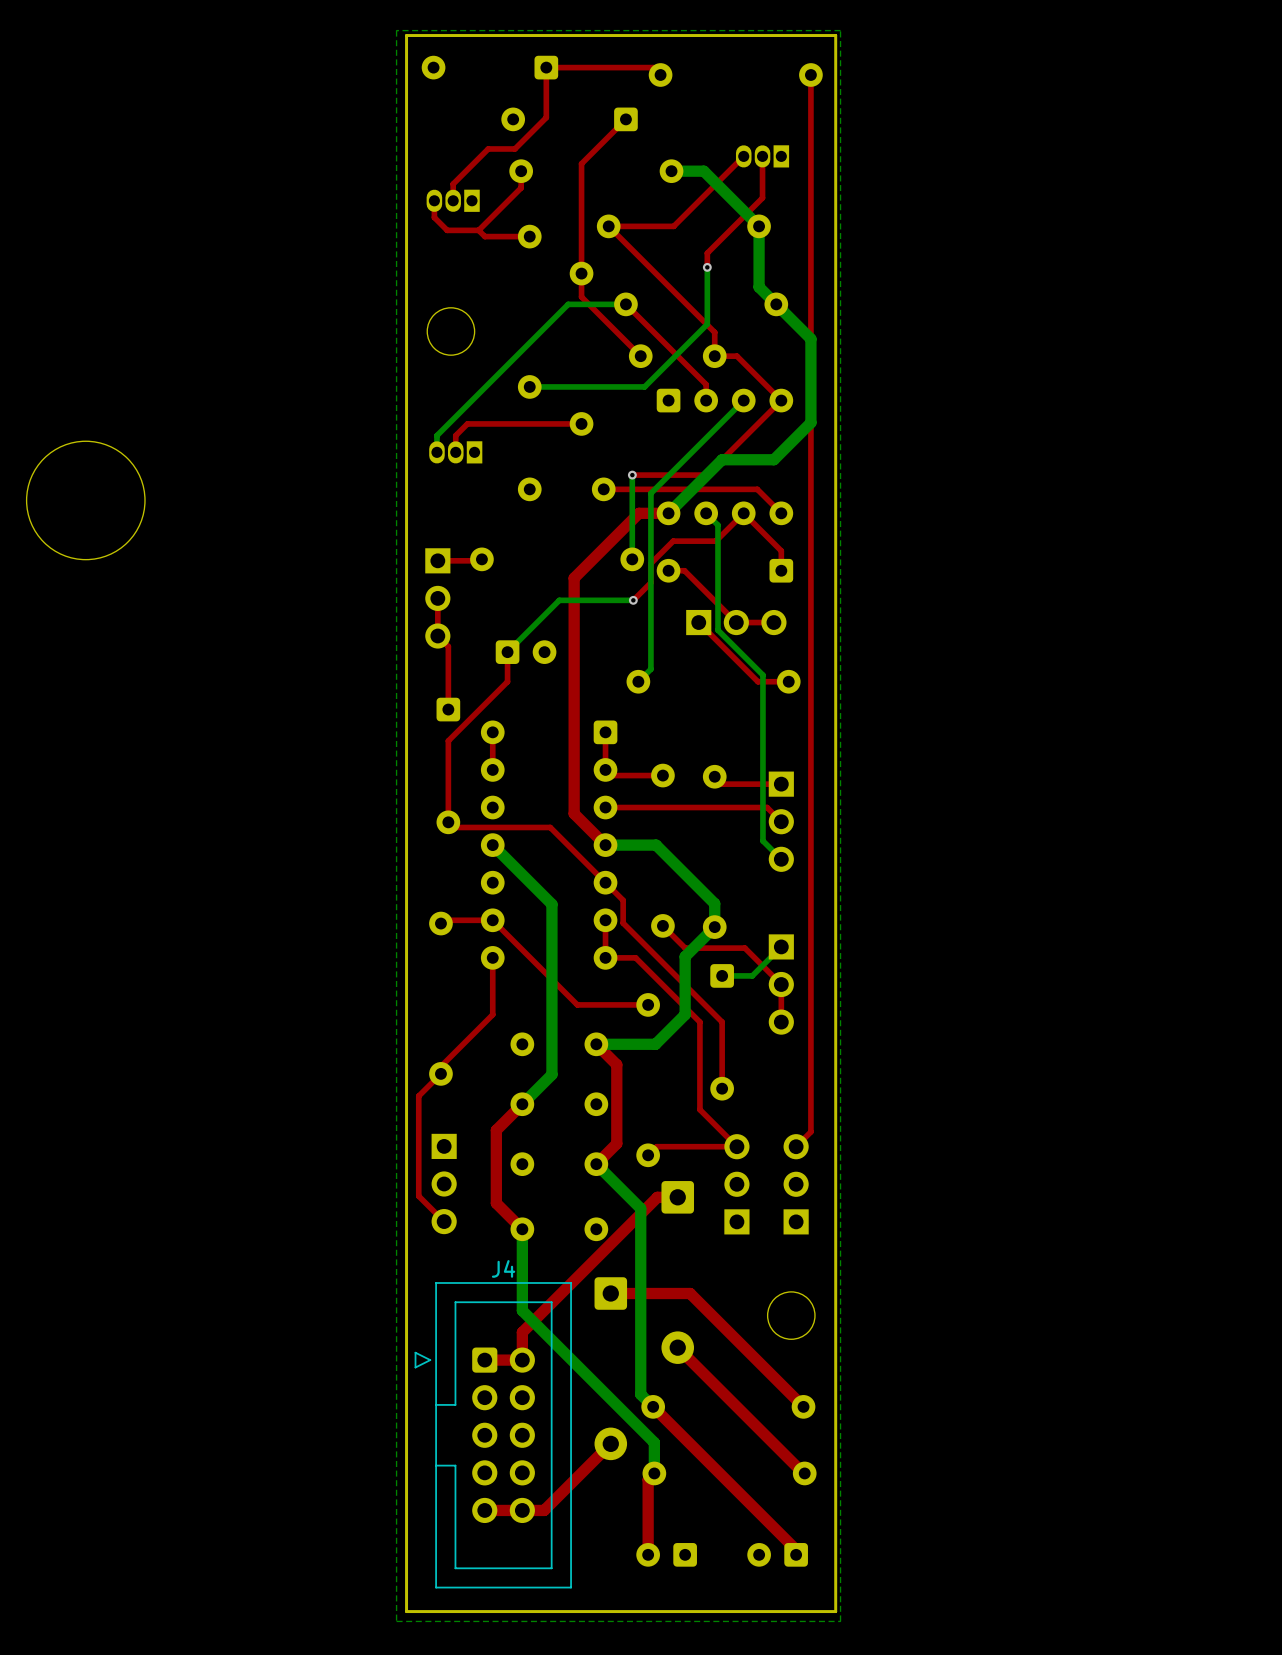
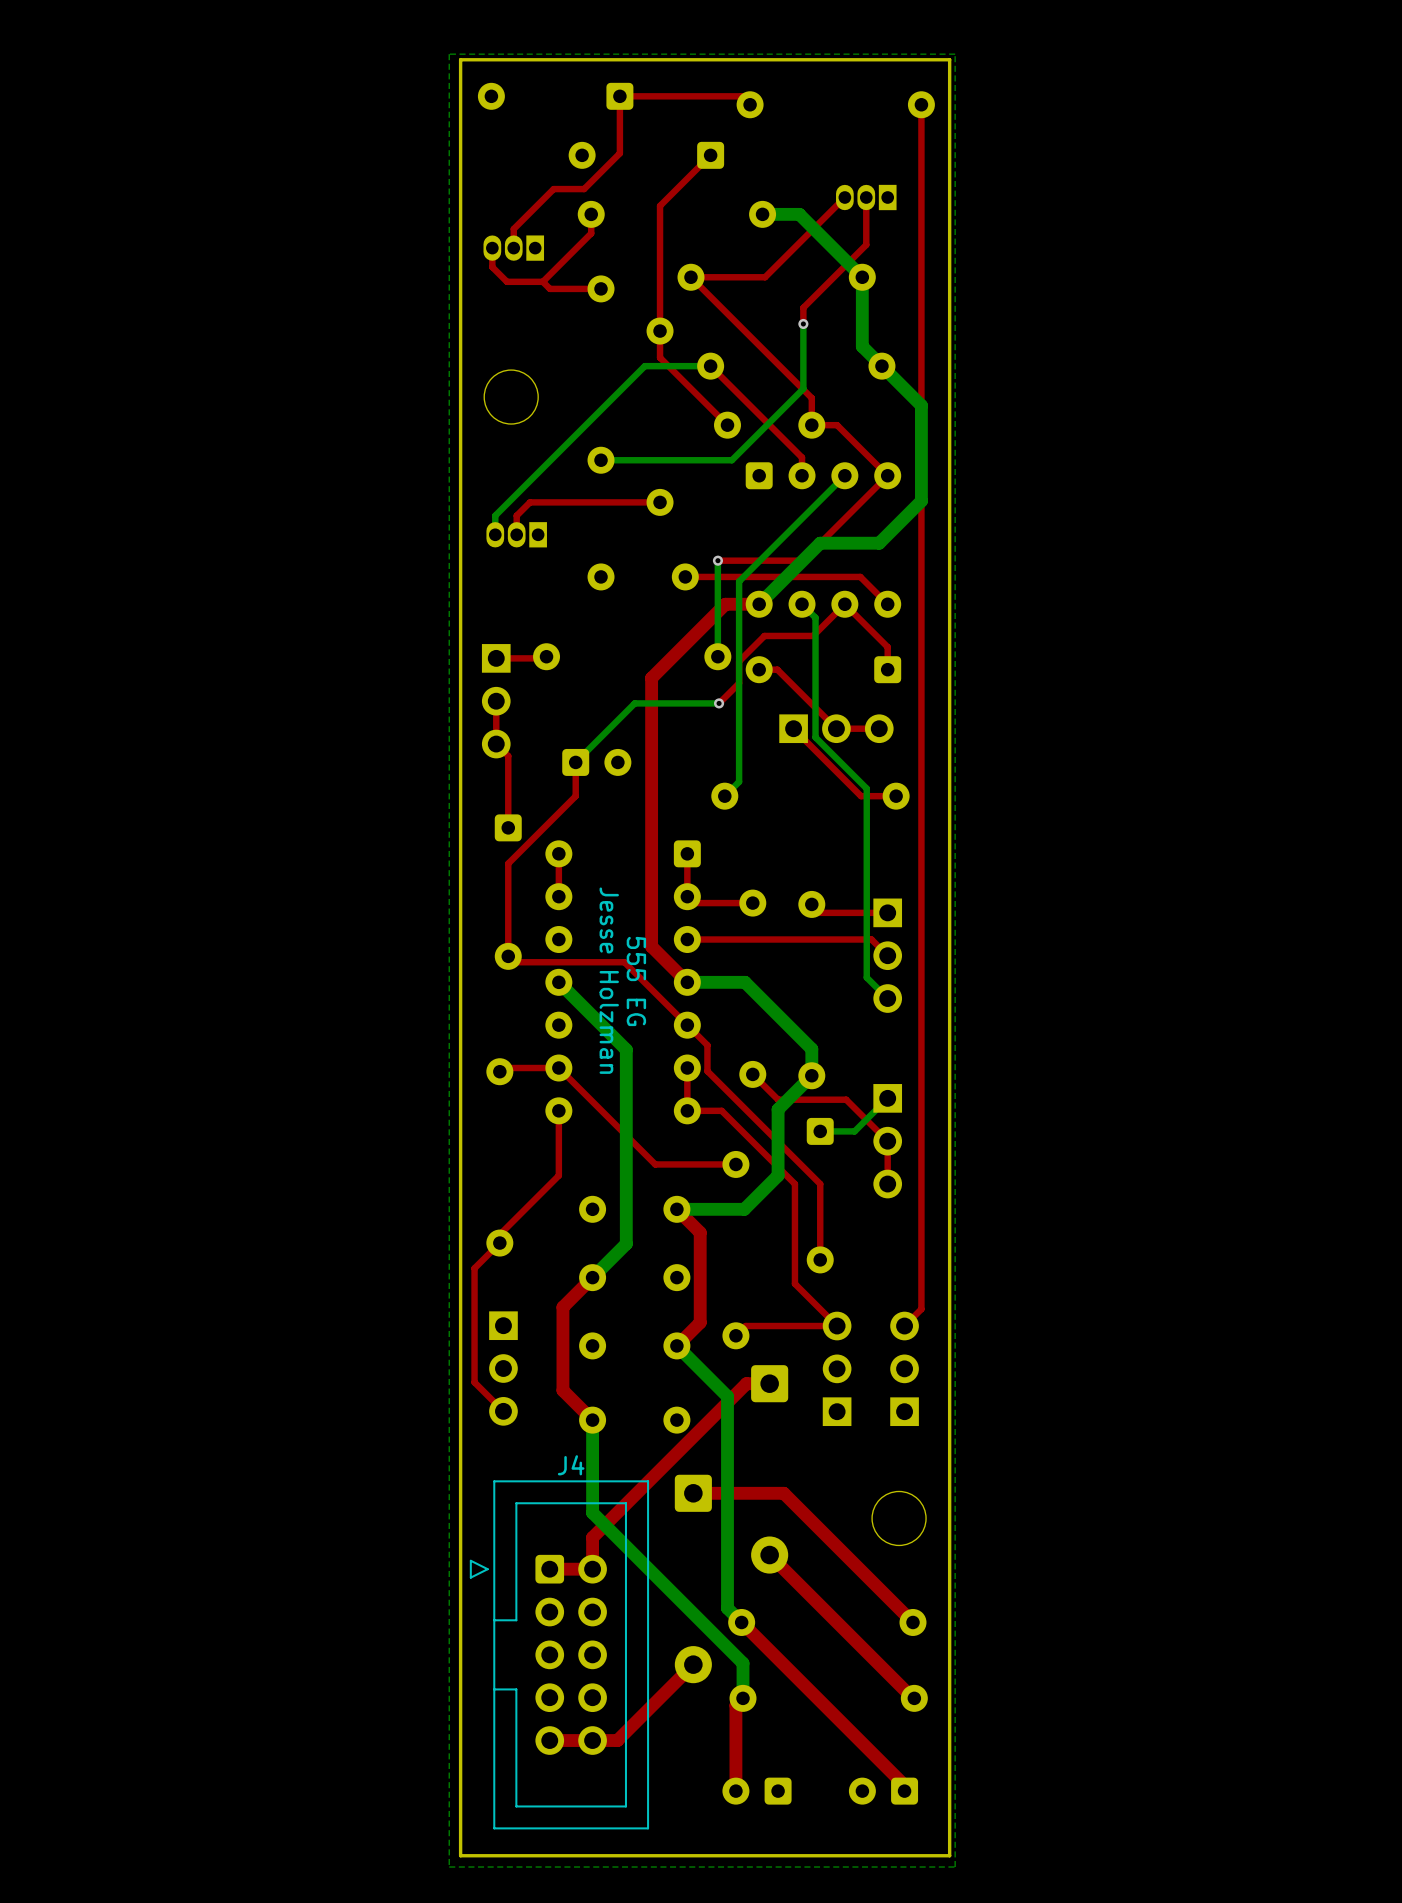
round board edge: [26, 440, 146, 561] -> none
text: none -> Jesse Holzman (609, 980)
text: none -> 555 EG (636, 981)

